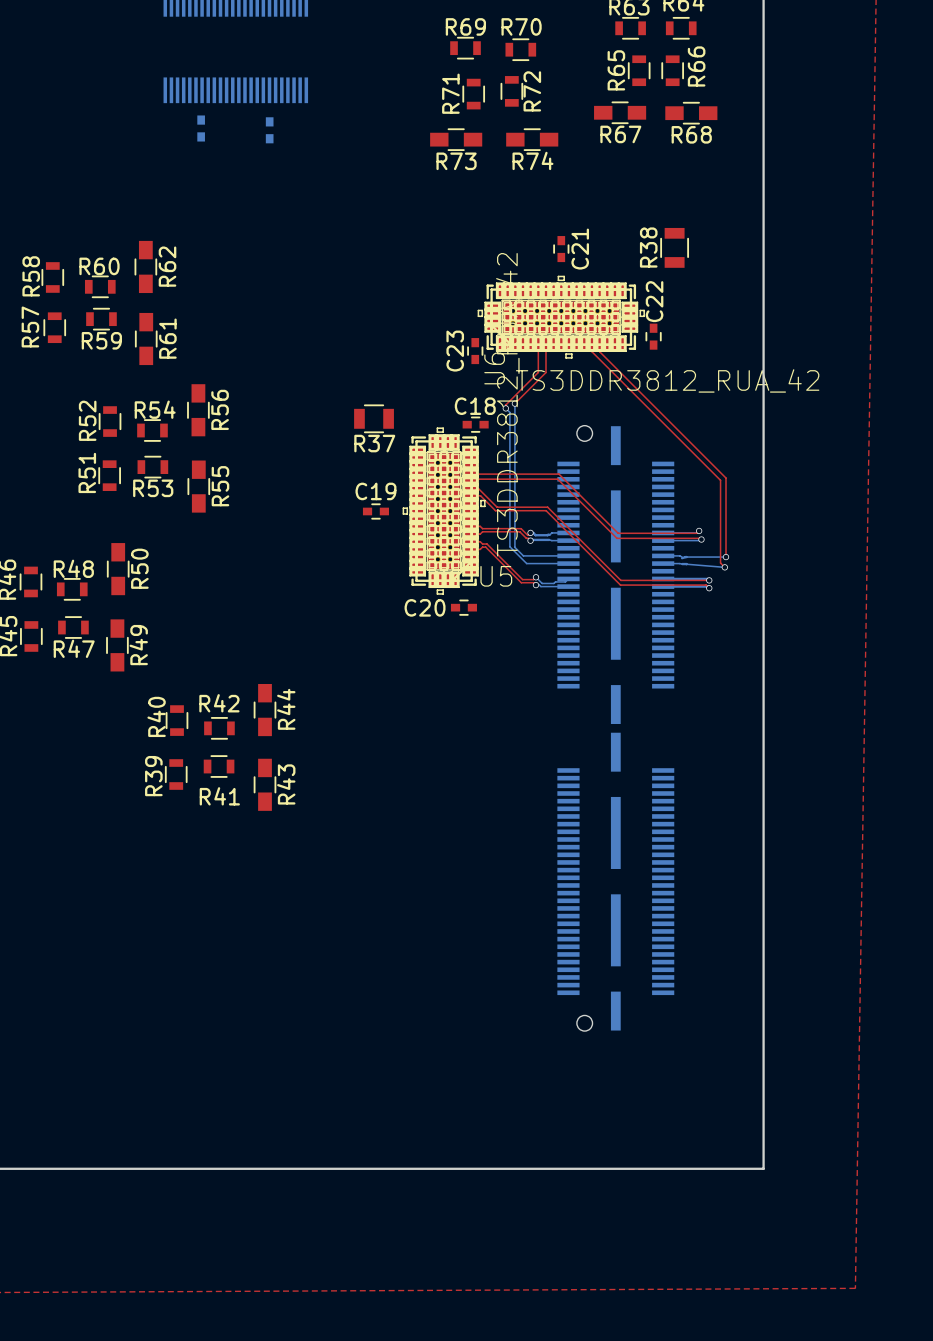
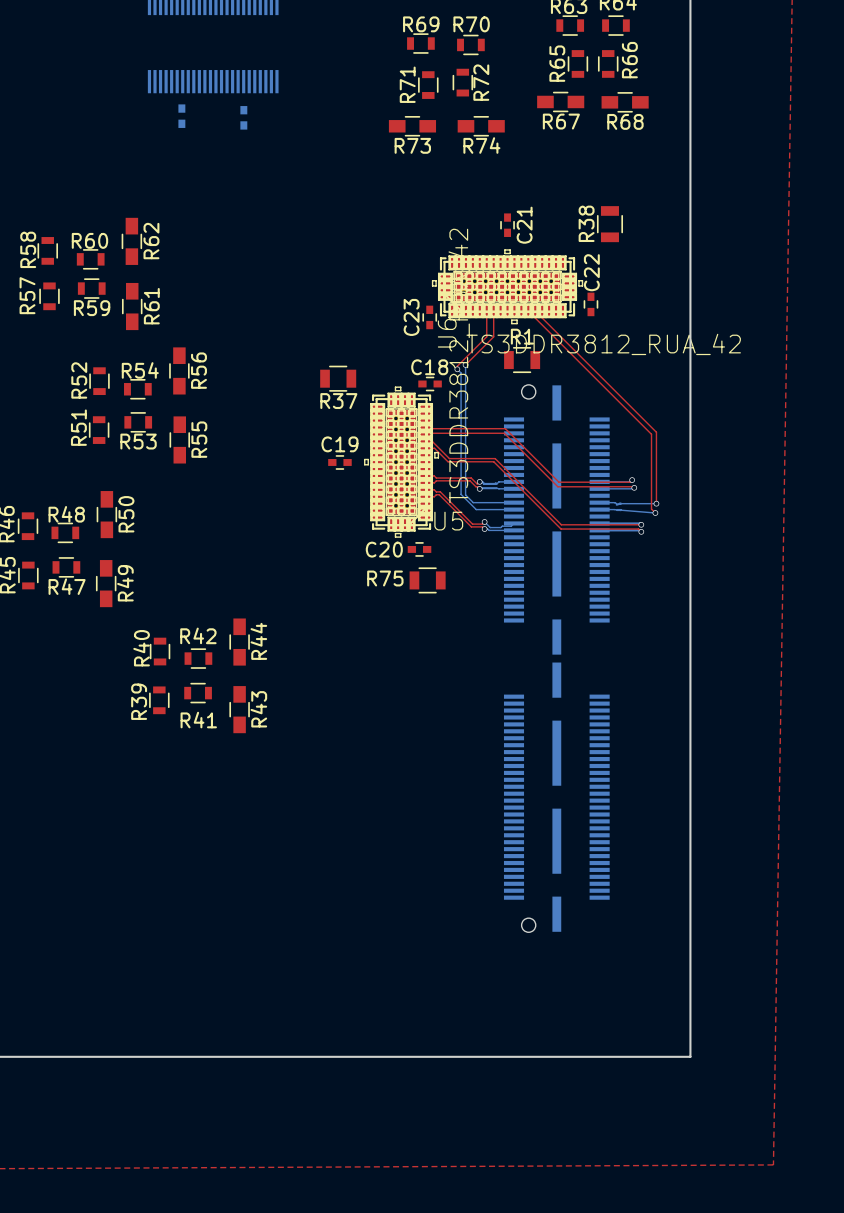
R1: none -> (522, 360)
R75: none -> (427, 580)

